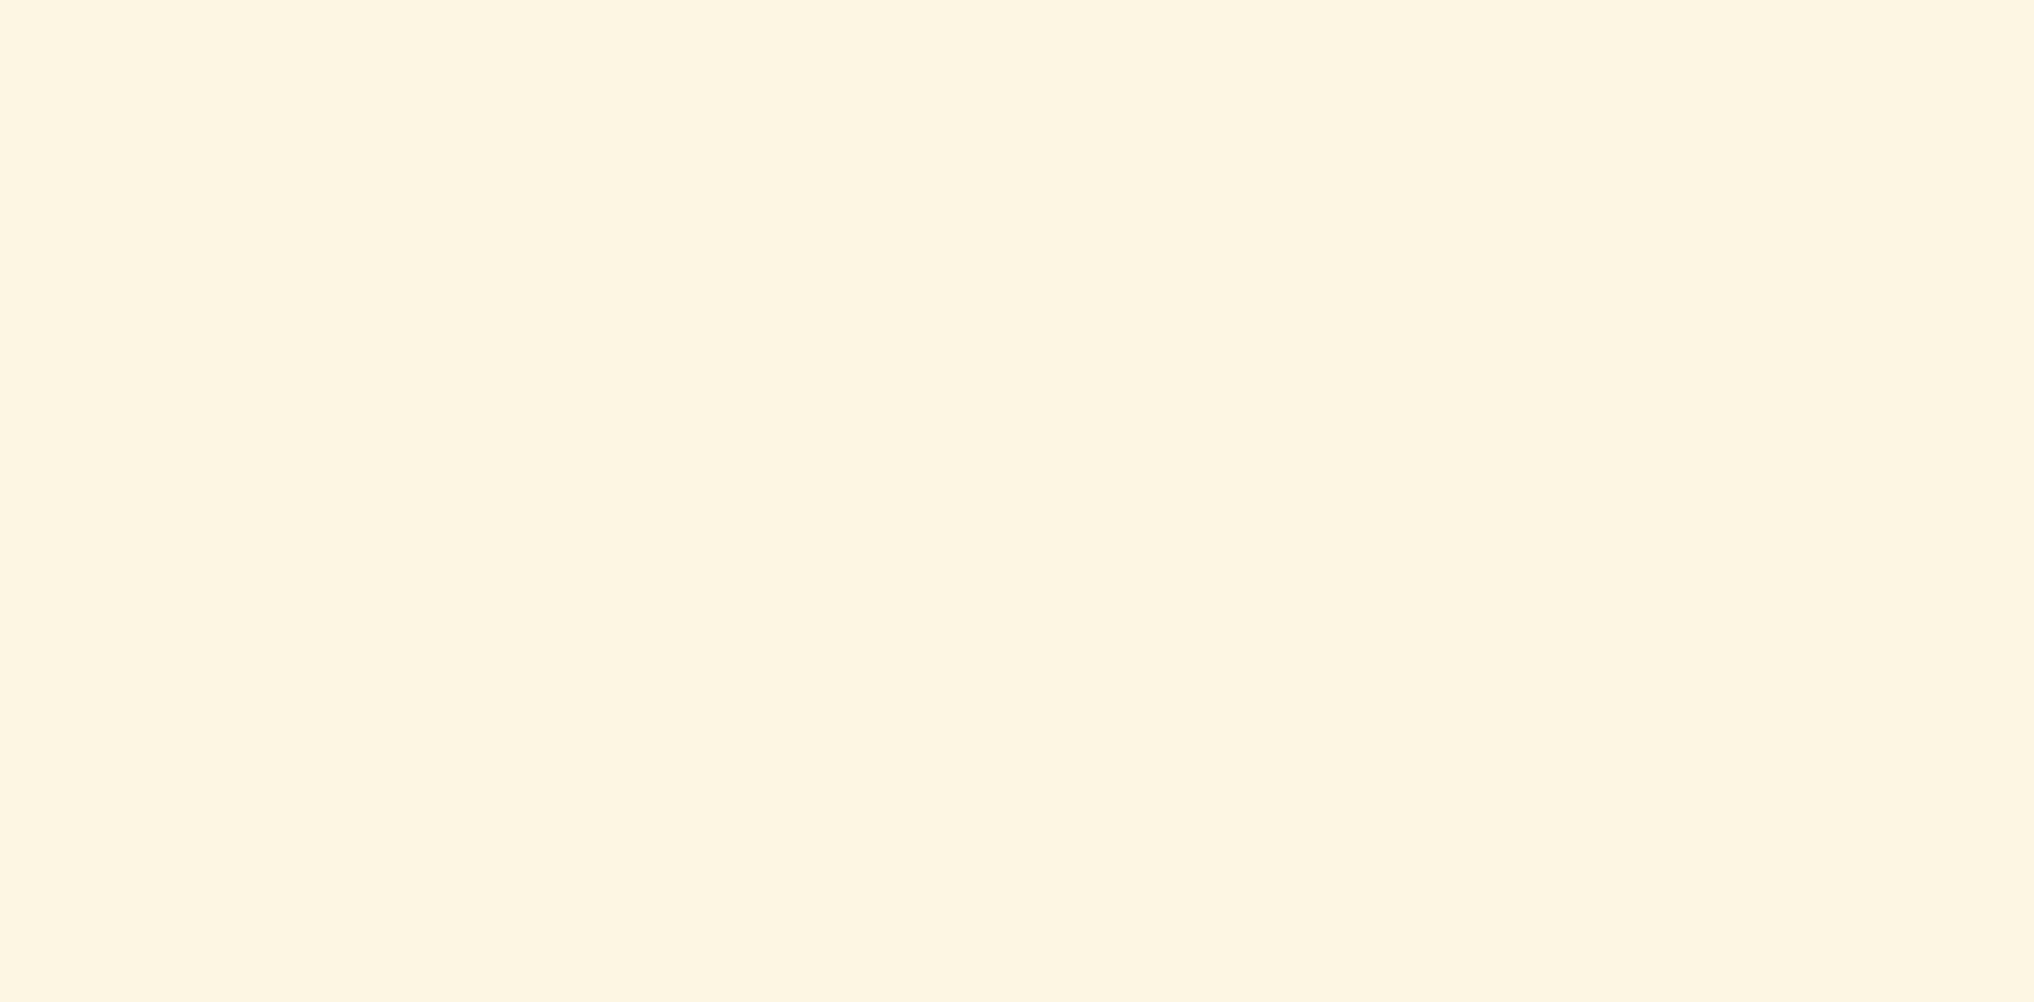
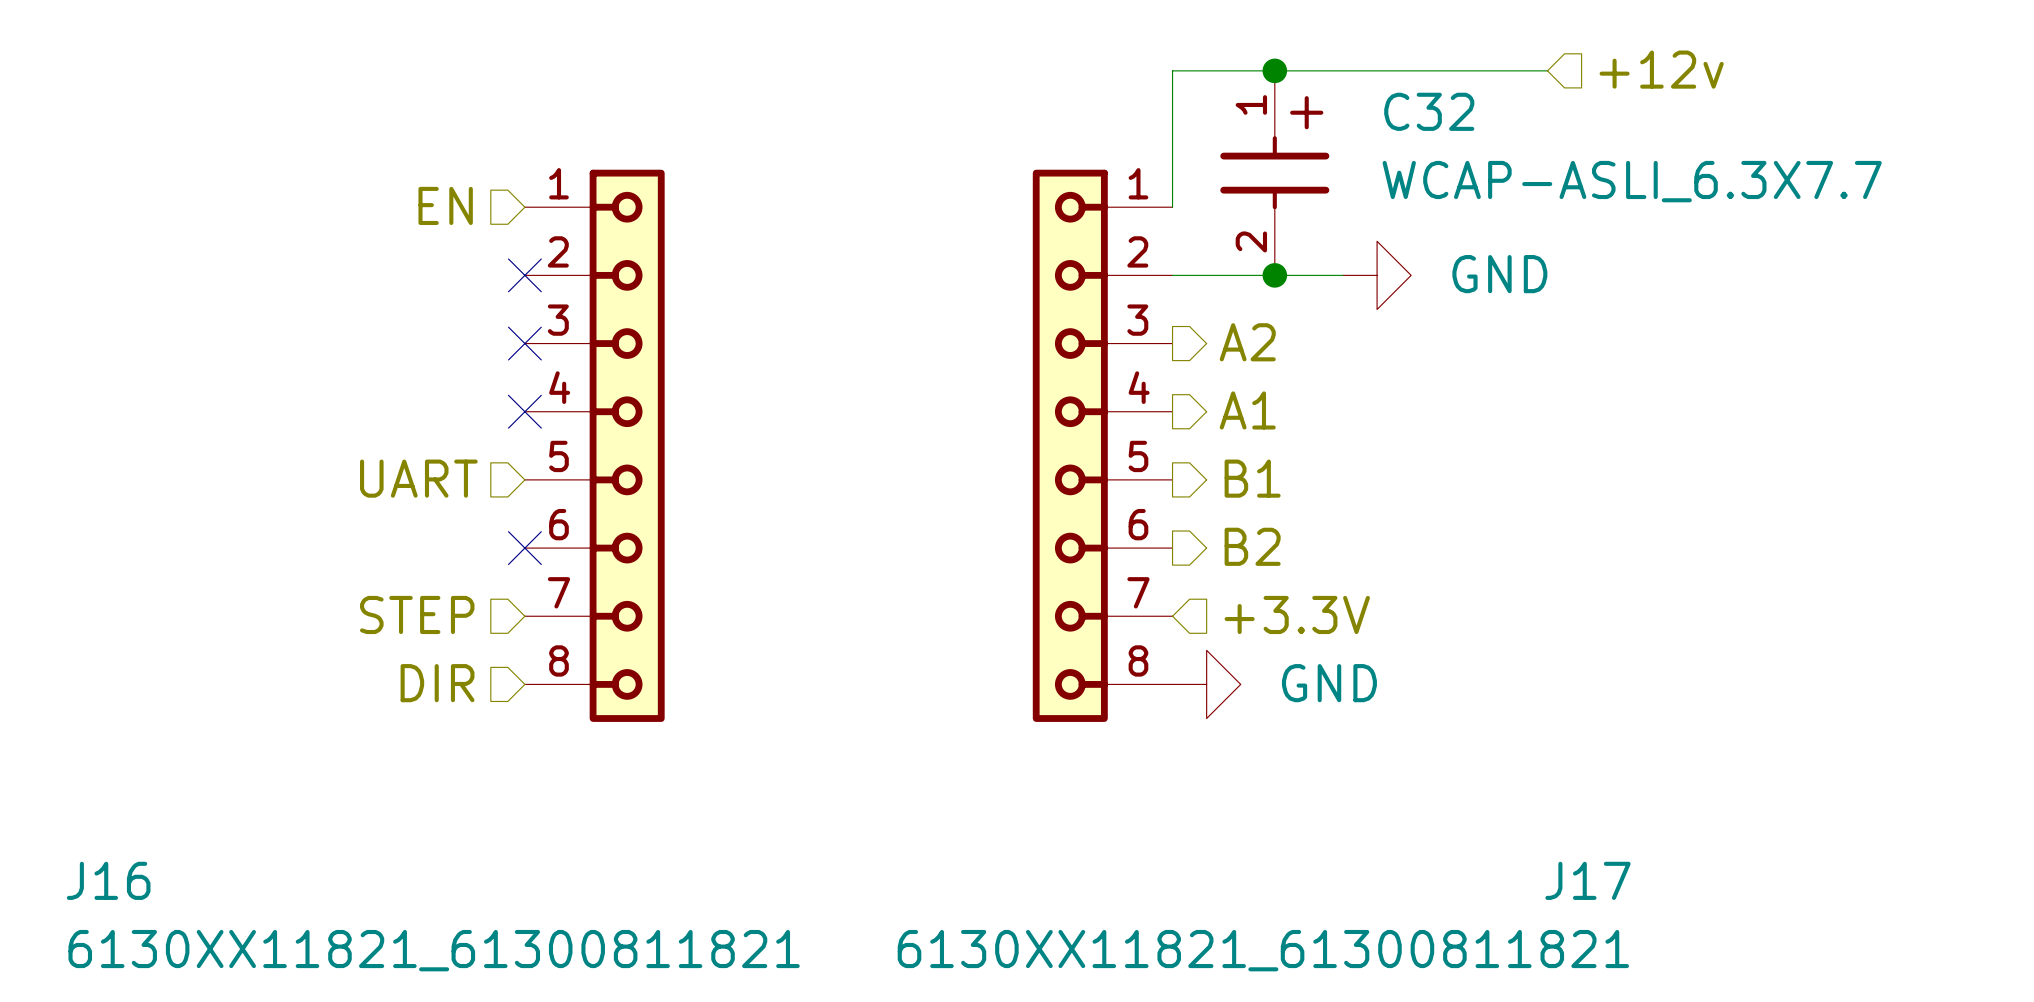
hierarchical label: none -> +12v (1661, 69)
junction: none -> (1274, 70)
wire: none -> (1547, 70) (1172, 70) (1172, 207)
C32: none -> WCAP-ASLI_6.3X7.7 (1274, 173)
hierarchical label: none -> EN (445, 205)
no-connect mark: none -> (524, 275)
wire: none -> (1172, 275) (1342, 275)
junction: none -> (1274, 275)
power symbol: none -> GND (1377, 275)
hierarchical label: none -> A2 (1247, 342)
no-connect mark: none -> (524, 343)
hierarchical label: none -> A1 (1247, 410)
no-connect mark: none -> (524, 411)
J16: none -> 6130XX11821_61300811821 (594, 445)
J17: none -> 6130XX11821_61300811821 (1102, 445)
hierarchical label: none -> UART (418, 478)
hierarchical label: none -> B1 (1252, 478)
hierarchical label: none -> B2 (1252, 546)
no-connect mark: none -> (524, 548)
hierarchical label: none -> STEP (417, 614)
hierarchical label: none -> +3.3V (1297, 614)
hierarchical label: none -> DIR (437, 683)
power symbol: none -> GND (1206, 684)

